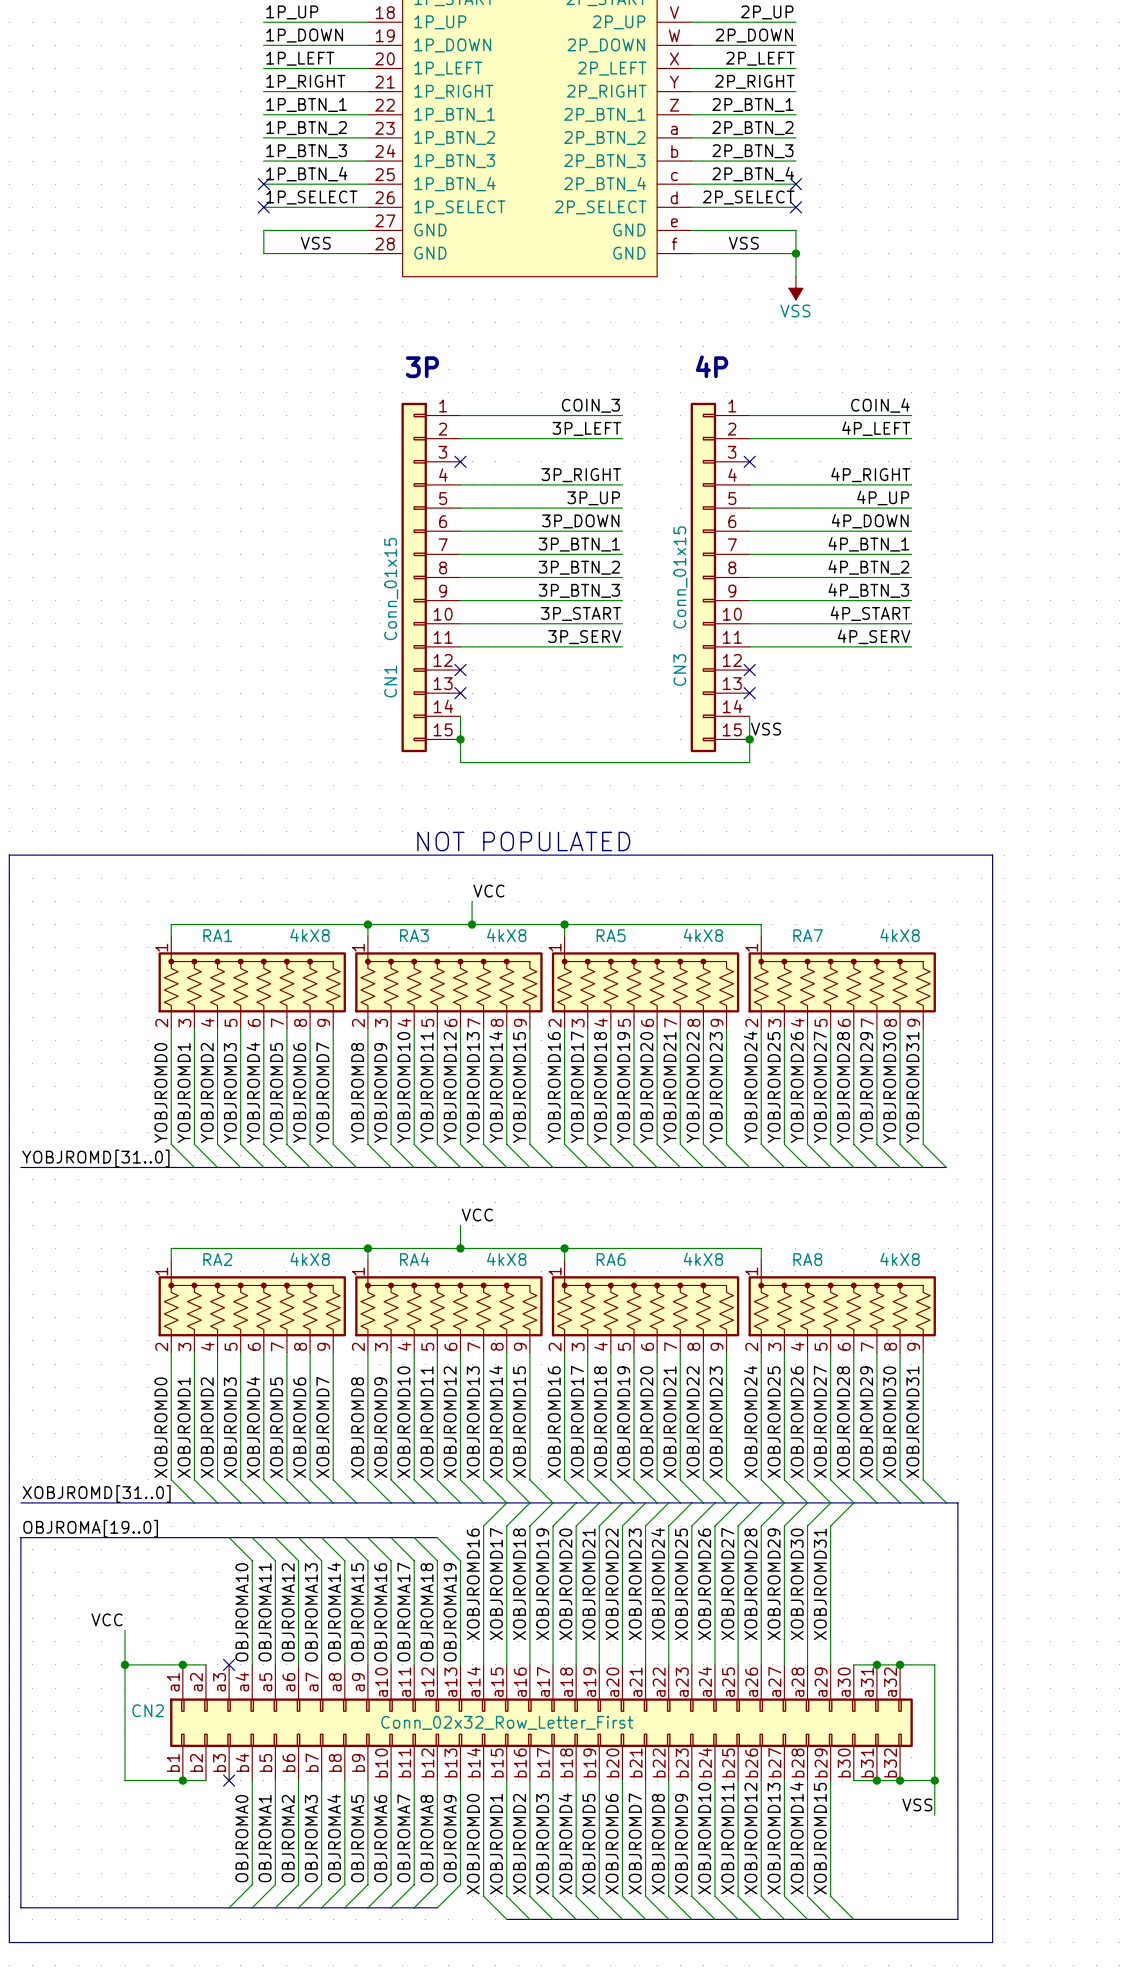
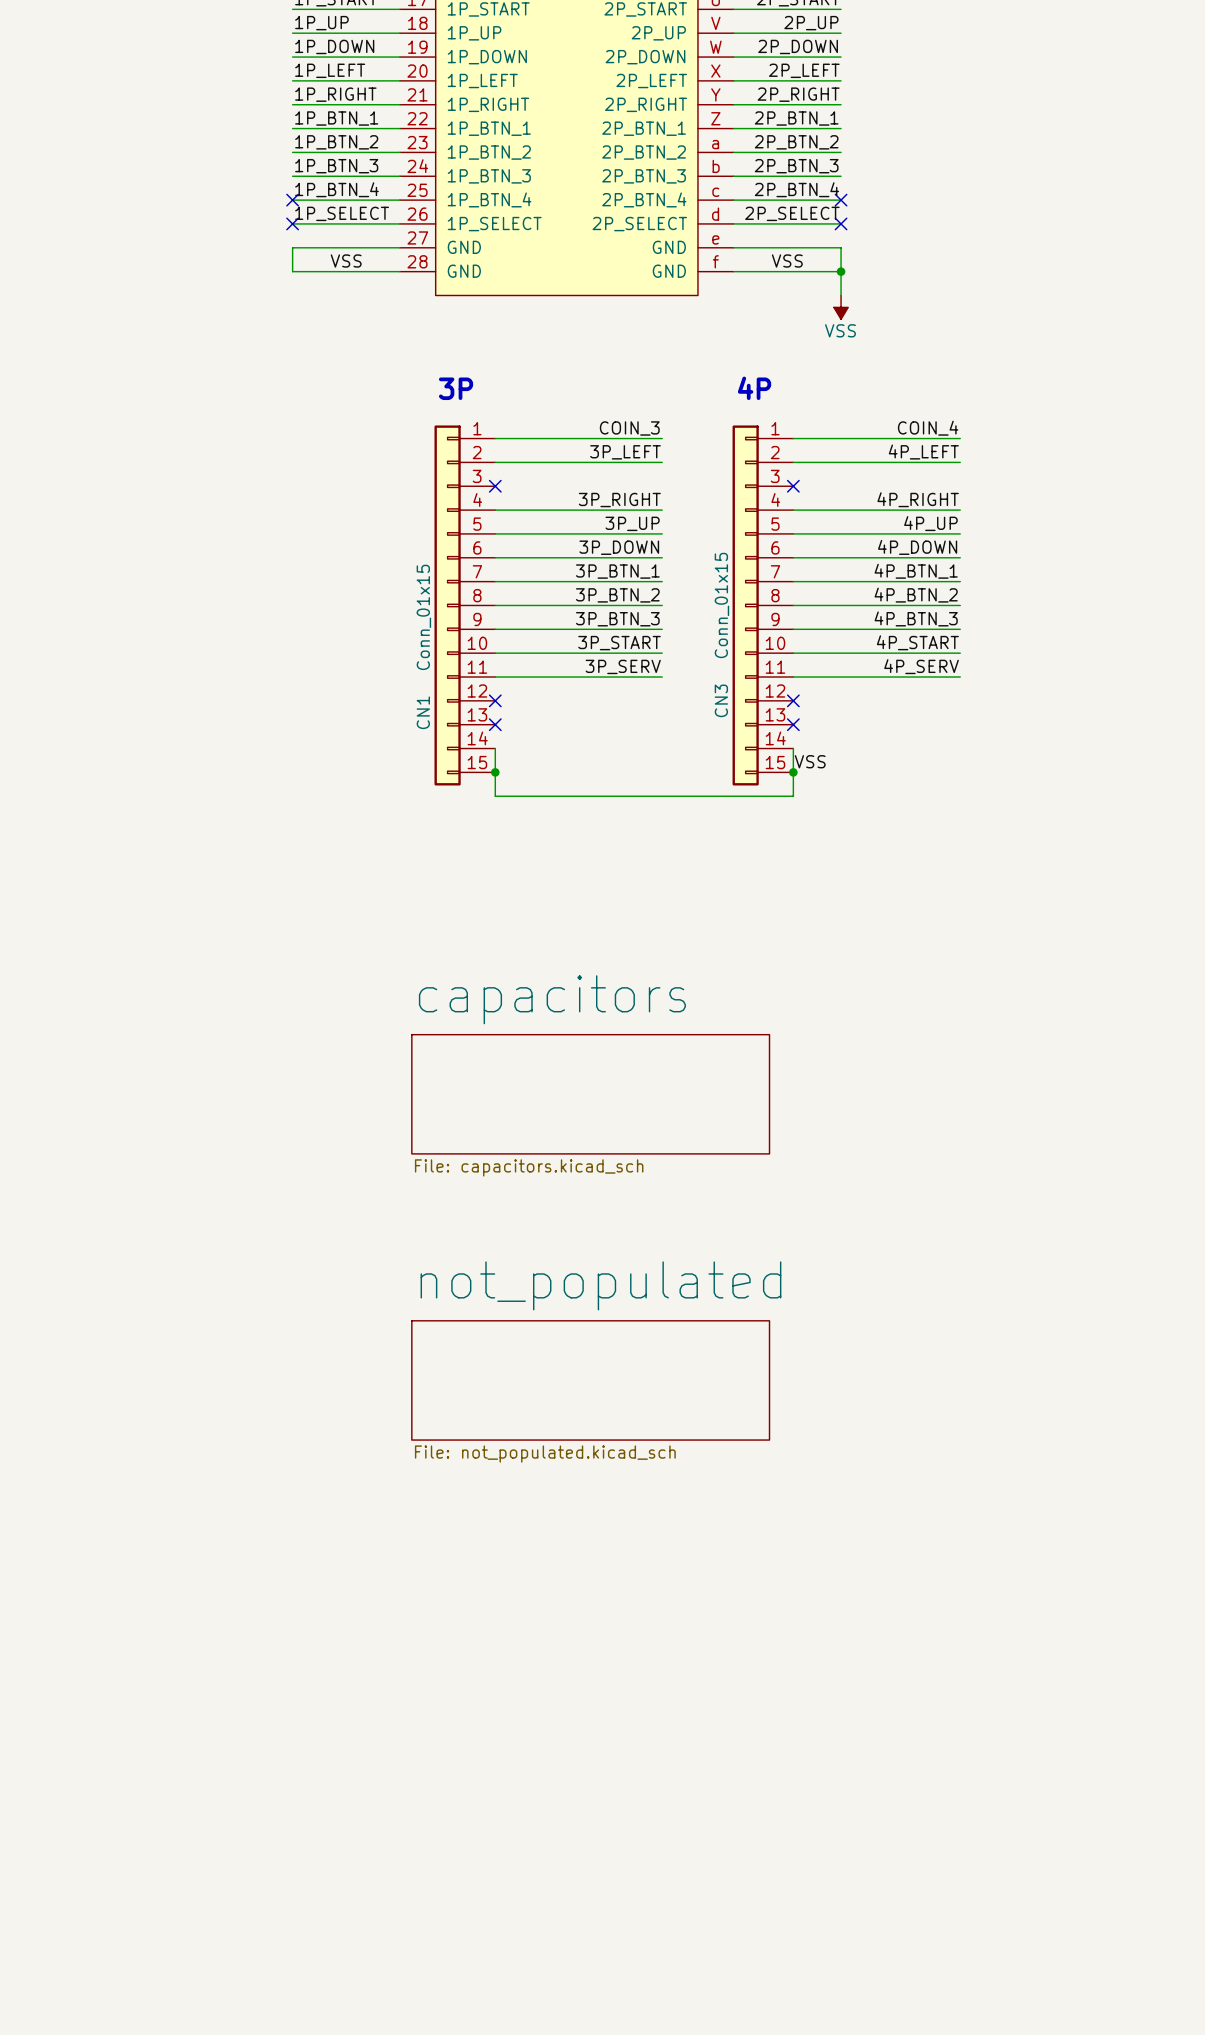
text: NOT POPULATED (523, 841) -> none
line: (9, 855) (9, 1942) (992, 1942) (992, 855) (9, 855) -> none
label: VCC (488, 891) -> none
wire: (472, 901) (472, 924) -> none
wire: (367, 924) (367, 936) -> none
junction: (367, 924) -> none
junction: (472, 924) -> none
wire: (564, 924) (564, 936) -> none
junction: (564, 924) -> none
wire: (171, 936) (171, 924) (761, 924) (761, 936) -> none
RA1: 4kX8 (252, 982) -> none
RA3: 4kX8 (448, 982) -> none
RA5: 4kX8 (645, 982) -> none
RA7: 4kX8 (842, 982) -> none
wire: (171, 1028) (171, 1144) (194, 1167) -> none
wire: (194, 1028) (194, 1144) (217, 1167) -> none
wire: (217, 1028) (217, 1144) (240, 1167) -> none
wire: (240, 1028) (240, 1144) (263, 1167) -> none
wire: (263, 1028) (263, 1144) (286, 1167) -> none
wire: (286, 1028) (286, 1144) (310, 1167) -> none
wire: (310, 1028) (310, 1144) (333, 1167) -> none
wire: (333, 1028) (333, 1144) (356, 1167) -> none
wire: (367, 1028) (367, 1144) (391, 1167) -> none
wire: (391, 1028) (391, 1144) (414, 1167) -> none
wire: (414, 1028) (414, 1144) (437, 1167) -> none
wire: (437, 1028) (437, 1144) (460, 1167) -> none
wire: (460, 1028) (460, 1144) (483, 1167) -> none
wire: (483, 1028) (483, 1144) (506, 1167) -> none
wire: (506, 1028) (506, 1144) (529, 1167) -> none
wire: (529, 1028) (529, 1144) (553, 1167) -> none
wire: (564, 1028) (564, 1144) (587, 1167) -> none
wire: (587, 1028) (587, 1144) (610, 1167) -> none
wire: (610, 1028) (610, 1144) (634, 1167) -> none
wire: (634, 1028) (634, 1144) (657, 1167) -> none
wire: (657, 1028) (657, 1144) (680, 1167) -> none
wire: (680, 1028) (680, 1144) (703, 1167) -> none
wire: (703, 1028) (703, 1144) (726, 1167) -> none
wire: (726, 1028) (726, 1144) (749, 1167) -> none
wire: (761, 1028) (761, 1144) (784, 1167) -> none
wire: (784, 1028) (784, 1144) (807, 1167) -> none
wire: (807, 1028) (807, 1144) (830, 1167) -> none
wire: (830, 1028) (830, 1144) (853, 1167) -> none
wire: (853, 1028) (853, 1144) (876, 1167) -> none
wire: (876, 1028) (876, 1144) (900, 1167) -> none
wire: (900, 1028) (900, 1144) (923, 1167) -> none
wire: (923, 1028) (923, 1144) (946, 1167) -> none
sheet capacitors: none -> File: capacitors.kicad_sch (590, 1094)
label: YOBJROMD10 (403, 1087) -> none
label: YOBJROMD11 (427, 1087) -> none
label: YOBJROMD12 (450, 1087) -> none
label: YOBJROMD13 (473, 1087) -> none
label: YOBJROMD14 (496, 1087) -> none
label: YOBJROMD15 (519, 1087) -> none
label: YOBJROMD16 (554, 1087) -> none
label: YOBJROMD17 (577, 1087) -> none
label: YOBJROMD18 (600, 1087) -> none
label: YOBJROMD19 (623, 1087) -> none
label: YOBJROMD20 (646, 1087) -> none
label: YOBJROMD21 (669, 1087) -> none
label: YOBJROMD22 (693, 1087) -> none
label: YOBJROMD23 (716, 1087) -> none
label: YOBJROMD24 (750, 1087) -> none
label: YOBJROMD25 (774, 1087) -> none
label: YOBJROMD26 (797, 1087) -> none
label: YOBJROMD27 (820, 1087) -> none
label: YOBJROMD28 (843, 1087) -> none
label: YOBJROMD29 (866, 1087) -> none
label: YOBJROMD30 (889, 1087) -> none
label: YOBJROMD31 (912, 1087) -> none
label: YOBJROMD4 (253, 1092) -> none
label: YOBJROMD7 (322, 1092) -> none
label: YOBJROMD0 (160, 1093) -> none
label: YOBJROMD1 (184, 1093) -> none
label: YOBJROMD2 (207, 1093) -> none
label: YOBJROMD3 (230, 1093) -> none
label: YOBJROMD5 (276, 1093) -> none
label: YOBJROMD6 (299, 1093) -> none
label: YOBJROMD8 (357, 1093) -> none
label: YOBJROMD9 (380, 1093) -> none
label: YOBJROMD[31..0] (95, 1158) -> none
bus: (20, 1167) (946, 1167) -> none
label: VCC (477, 1214) -> none
wire: (460, 1225) (460, 1248) -> none
wire: (367, 1248) (367, 1260) -> none
junction: (367, 1248) -> none
junction: (460, 1248) -> none
wire: (564, 1248) (564, 1260) -> none
junction: (564, 1248) -> none
wire: (171, 1260) (171, 1248) (761, 1248) (761, 1260) -> none
RA2: 4kX8 (252, 1306) -> none
RA4: 4kX8 (448, 1306) -> none
RA6: 4kX8 (645, 1306) -> none
RA8: 4kX8 (842, 1306) -> none
sheet not_populated: none -> File: not_populated.kicad_sch (590, 1380)
wire: (171, 1352) (171, 1479) (194, 1502) -> none
wire: (194, 1352) (194, 1479) (217, 1502) -> none
wire: (217, 1352) (217, 1479) (240, 1502) -> none
wire: (240, 1352) (240, 1479) (263, 1502) -> none
wire: (263, 1352) (263, 1479) (286, 1502) -> none
wire: (286, 1352) (286, 1479) (310, 1502) -> none
wire: (310, 1352) (310, 1479) (333, 1502) -> none
wire: (333, 1352) (333, 1479) (356, 1502) -> none
wire: (367, 1352) (367, 1479) (391, 1502) -> none
wire: (391, 1352) (391, 1479) (414, 1502) -> none
wire: (414, 1352) (414, 1479) (437, 1502) -> none
wire: (437, 1352) (437, 1479) (460, 1502) -> none
wire: (460, 1352) (460, 1479) (483, 1502) -> none
wire: (483, 1352) (483, 1479) (506, 1502) (483, 1526) (483, 1664) -> none
wire: (506, 1352) (506, 1479) (529, 1502) (506, 1526) (506, 1664) -> none
wire: (529, 1352) (529, 1479) (553, 1502) (529, 1526) (529, 1664) -> none
wire: (564, 1352) (564, 1479) (587, 1502) -> none
wire: (587, 1352) (587, 1479) (610, 1502) -> none
wire: (610, 1352) (610, 1479) (634, 1502) -> none
wire: (634, 1352) (634, 1479) (657, 1502) -> none
wire: (657, 1352) (657, 1479) (680, 1502) -> none
wire: (680, 1352) (680, 1479) (703, 1502) -> none
wire: (703, 1352) (703, 1479) (726, 1502) -> none
wire: (726, 1352) (726, 1479) (749, 1502) -> none
wire: (761, 1352) (761, 1479) (784, 1502) (761, 1526) (761, 1664) -> none
wire: (784, 1352) (784, 1479) (807, 1502) (784, 1526) (784, 1664) -> none
wire: (807, 1352) (807, 1479) (830, 1502) (807, 1526) (807, 1664) -> none
wire: (830, 1352) (830, 1479) (853, 1502) (830, 1526) (830, 1664) -> none
wire: (853, 1352) (853, 1479) (876, 1502) -> none
wire: (876, 1352) (876, 1479) (900, 1502) -> none
wire: (900, 1352) (900, 1479) (923, 1502) -> none
wire: (923, 1352) (923, 1479) (946, 1502) -> none
label: XOBJROMD14 (496, 1421) -> none
label: XOBJROMD17 (577, 1421) -> none
label: XOBJROMD24 (750, 1421) -> none
label: XOBJROMD27 (820, 1421) -> none
label: XOBJROMD10 (403, 1422) -> none
label: XOBJROMD11 (427, 1422) -> none
label: XOBJROMD12 (450, 1422) -> none
label: XOBJROMD13 (473, 1422) -> none
label: XOBJROMD15 (519, 1422) -> none
label: XOBJROMD16 (554, 1422) -> none
label: XOBJROMD18 (600, 1422) -> none
label: XOBJROMD19 (623, 1422) -> none
label: XOBJROMD20 (646, 1422) -> none
label: XOBJROMD21 (669, 1422) -> none
label: XOBJROMD22 (693, 1422) -> none
label: XOBJROMD23 (716, 1422) -> none
label: XOBJROMD25 (774, 1422) -> none
label: XOBJROMD26 (797, 1422) -> none
label: XOBJROMD28 (843, 1422) -> none
label: XOBJROMD29 (866, 1422) -> none
label: XOBJROMD30 (889, 1422) -> none
label: XOBJROMD31 (912, 1422) -> none
label: XOBJROMD0 (160, 1427) -> none
label: XOBJROMD1 (184, 1427) -> none
label: XOBJROMD2 (207, 1427) -> none
label: XOBJROMD3 (230, 1427) -> none
label: XOBJROMD4 (253, 1427) -> none
label: XOBJROMD5 (276, 1427) -> none
label: XOBJROMD6 (299, 1427) -> none
label: XOBJROMD7 (322, 1427) -> none
label: XOBJROMD8 (357, 1427) -> none
label: XOBJROMD9 (380, 1427) -> none
label: XOBJROMD[31..0] (96, 1493) -> none
bus: (20, 1502) (957, 1502) (957, 1919) (506, 1919) -> none
wire: (576, 1502) (553, 1526) (553, 1664) -> none
wire: (599, 1502) (576, 1526) (576, 1664) -> none
wire: (622, 1502) (599, 1526) (599, 1664) -> none
wire: (645, 1502) (622, 1526) (622, 1664) -> none
wire: (668, 1502) (645, 1526) (645, 1664) -> none
wire: (691, 1502) (668, 1526) (668, 1664) -> none
wire: (714, 1502) (691, 1526) (691, 1664) -> none
wire: (738, 1502) (714, 1526) (714, 1664) -> none
wire: (761, 1502) (738, 1526) (738, 1664) -> none
label: OBJROMA[19..0] (90, 1528) -> none
wire: (229, 1537) (252, 1560) (252, 1664) -> none
wire: (252, 1537) (275, 1560) (275, 1664) -> none
wire: (275, 1537) (298, 1560) (298, 1664) -> none
wire: (298, 1537) (321, 1560) (321, 1664) -> none
wire: (321, 1537) (344, 1560) (344, 1664) -> none
wire: (344, 1537) (367, 1560) (367, 1664) -> none
wire: (367, 1537) (391, 1560) (391, 1664) -> none
wire: (391, 1537) (414, 1560) (414, 1664) -> none
wire: (414, 1537) (437, 1560) (437, 1664) -> none
wire: (437, 1537) (460, 1560) (460, 1664) -> none
bus: (437, 1537) (20, 1537) (20, 1907) (437, 1907) -> none
label: XOBJROMD16 (473, 1584) -> none
label: XOBJROMD17 (496, 1584) -> none
label: XOBJROMD18 (519, 1584) -> none
label: XOBJROMD19 (542, 1584) -> none
label: XOBJROMD20 (565, 1584) -> none
label: XOBJROMD21 (588, 1584) -> none
label: XOBJROMD22 (612, 1584) -> none
label: XOBJROMD23 (635, 1584) -> none
label: XOBJROMD24 (658, 1584) -> none
label: XOBJROMD25 (681, 1584) -> none
label: XOBJROMD26 (704, 1584) -> none
label: XOBJROMD27 (727, 1584) -> none
label: XOBJROMD28 (750, 1584) -> none
label: XOBJROMD29 (774, 1584) -> none
label: XOBJROMD30 (797, 1584) -> none
label: XOBJROMD31 (820, 1584) -> none
label: OBJROMA10 (241, 1612) -> none
label: OBJROMA11 (265, 1612) -> none
label: OBJROMA12 (288, 1612) -> none
label: OBJROMA13 (311, 1612) -> none
label: OBJROMA14 (334, 1612) -> none
label: OBJROMA15 (357, 1612) -> none
label: OBJROMA16 (380, 1612) -> none
label: OBJROMA17 (403, 1612) -> none
label: OBJROMA18 (427, 1612) -> none
label: OBJROMA19 (450, 1612) -> none
label: VCC (107, 1619) -> none
wire: (125, 1630) (125, 1780) (205, 1780) -> none
wire: (125, 1664) (205, 1664) -> none
junction: (125, 1664) -> none
junction: (182, 1664) -> none
no-connect mark: (229, 1664) -> none
wire: (853, 1664) (934, 1664) (934, 1815) -> none
junction: (876, 1664) -> none
junction: (900, 1664) -> none
CN2: Conn_02x32_Row_Letter_First (541, 1722) -> none
junction: (182, 1780) -> none
no-connect mark: (229, 1780) -> none
wire: (252, 1780) (252, 1884) (229, 1907) -> none
wire: (275, 1780) (275, 1884) (252, 1907) -> none
wire: (298, 1780) (298, 1884) (275, 1907) -> none
wire: (321, 1780) (321, 1884) (298, 1907) -> none
wire: (344, 1780) (344, 1884) (321, 1907) -> none
wire: (367, 1780) (367, 1884) (344, 1907) -> none
wire: (391, 1780) (391, 1884) (367, 1907) -> none
wire: (414, 1780) (414, 1884) (391, 1907) -> none
wire: (437, 1780) (437, 1884) (414, 1907) -> none
wire: (460, 1780) (460, 1884) (437, 1907) -> none
wire: (483, 1780) (483, 1896) (506, 1919) -> none
wire: (506, 1780) (506, 1896) (529, 1919) -> none
wire: (529, 1780) (529, 1896) (553, 1919) -> none
wire: (553, 1780) (553, 1896) (576, 1919) -> none
wire: (576, 1780) (576, 1896) (599, 1919) -> none
wire: (599, 1780) (599, 1896) (622, 1919) -> none
wire: (622, 1780) (622, 1896) (645, 1919) -> none
wire: (645, 1780) (645, 1896) (668, 1919) -> none
wire: (668, 1780) (668, 1896) (691, 1919) -> none
wire: (691, 1780) (691, 1896) (714, 1919) -> none
wire: (714, 1780) (714, 1896) (738, 1919) -> none
wire: (738, 1780) (738, 1896) (761, 1919) -> none
wire: (761, 1780) (761, 1896) (784, 1919) -> none
wire: (784, 1780) (784, 1896) (807, 1919) -> none
wire: (807, 1780) (807, 1896) (830, 1919) -> none
wire: (830, 1780) (830, 1896) (853, 1919) -> none
wire: (853, 1780) (934, 1780) -> none
junction: (876, 1780) -> none
junction: (900, 1780) -> none
junction: (934, 1780) -> none
label: VSS (917, 1804) -> none
label: OBJROMA0 (241, 1838) -> none
label: OBJROMA1 (265, 1838) -> none
label: OBJROMA2 (288, 1838) -> none
label: OBJROMA3 (311, 1838) -> none
label: OBJROMA4 (334, 1838) -> none
label: OBJROMA5 (357, 1838) -> none
label: OBJROMA6 (380, 1838) -> none
label: OBJROMA7 (403, 1838) -> none
label: OBJROMA8 (427, 1838) -> none
label: OBJROMA9 (450, 1838) -> none
label: XOBJROMD10 (704, 1838) -> none
label: XOBJROMD11 (727, 1838) -> none
label: XOBJROMD12 (750, 1838) -> none
label: XOBJROMD13 (774, 1838) -> none
label: XOBJROMD14 (796, 1838) -> none
label: XOBJROMD15 (820, 1838) -> none
label: XOBJROMD4 (565, 1843) -> none
label: XOBJROMD7 (635, 1843) -> none
label: XOBJROMD0 (473, 1844) -> none
label: XOBJROMD1 (496, 1844) -> none
label: XOBJROMD2 (519, 1844) -> none
label: XOBJROMD3 (542, 1844) -> none
label: XOBJROMD5 (588, 1844) -> none
label: XOBJROMD6 (612, 1844) -> none
label: XOBJROMD8 (658, 1844) -> none
label: XOBJROMD9 (681, 1844) -> none

